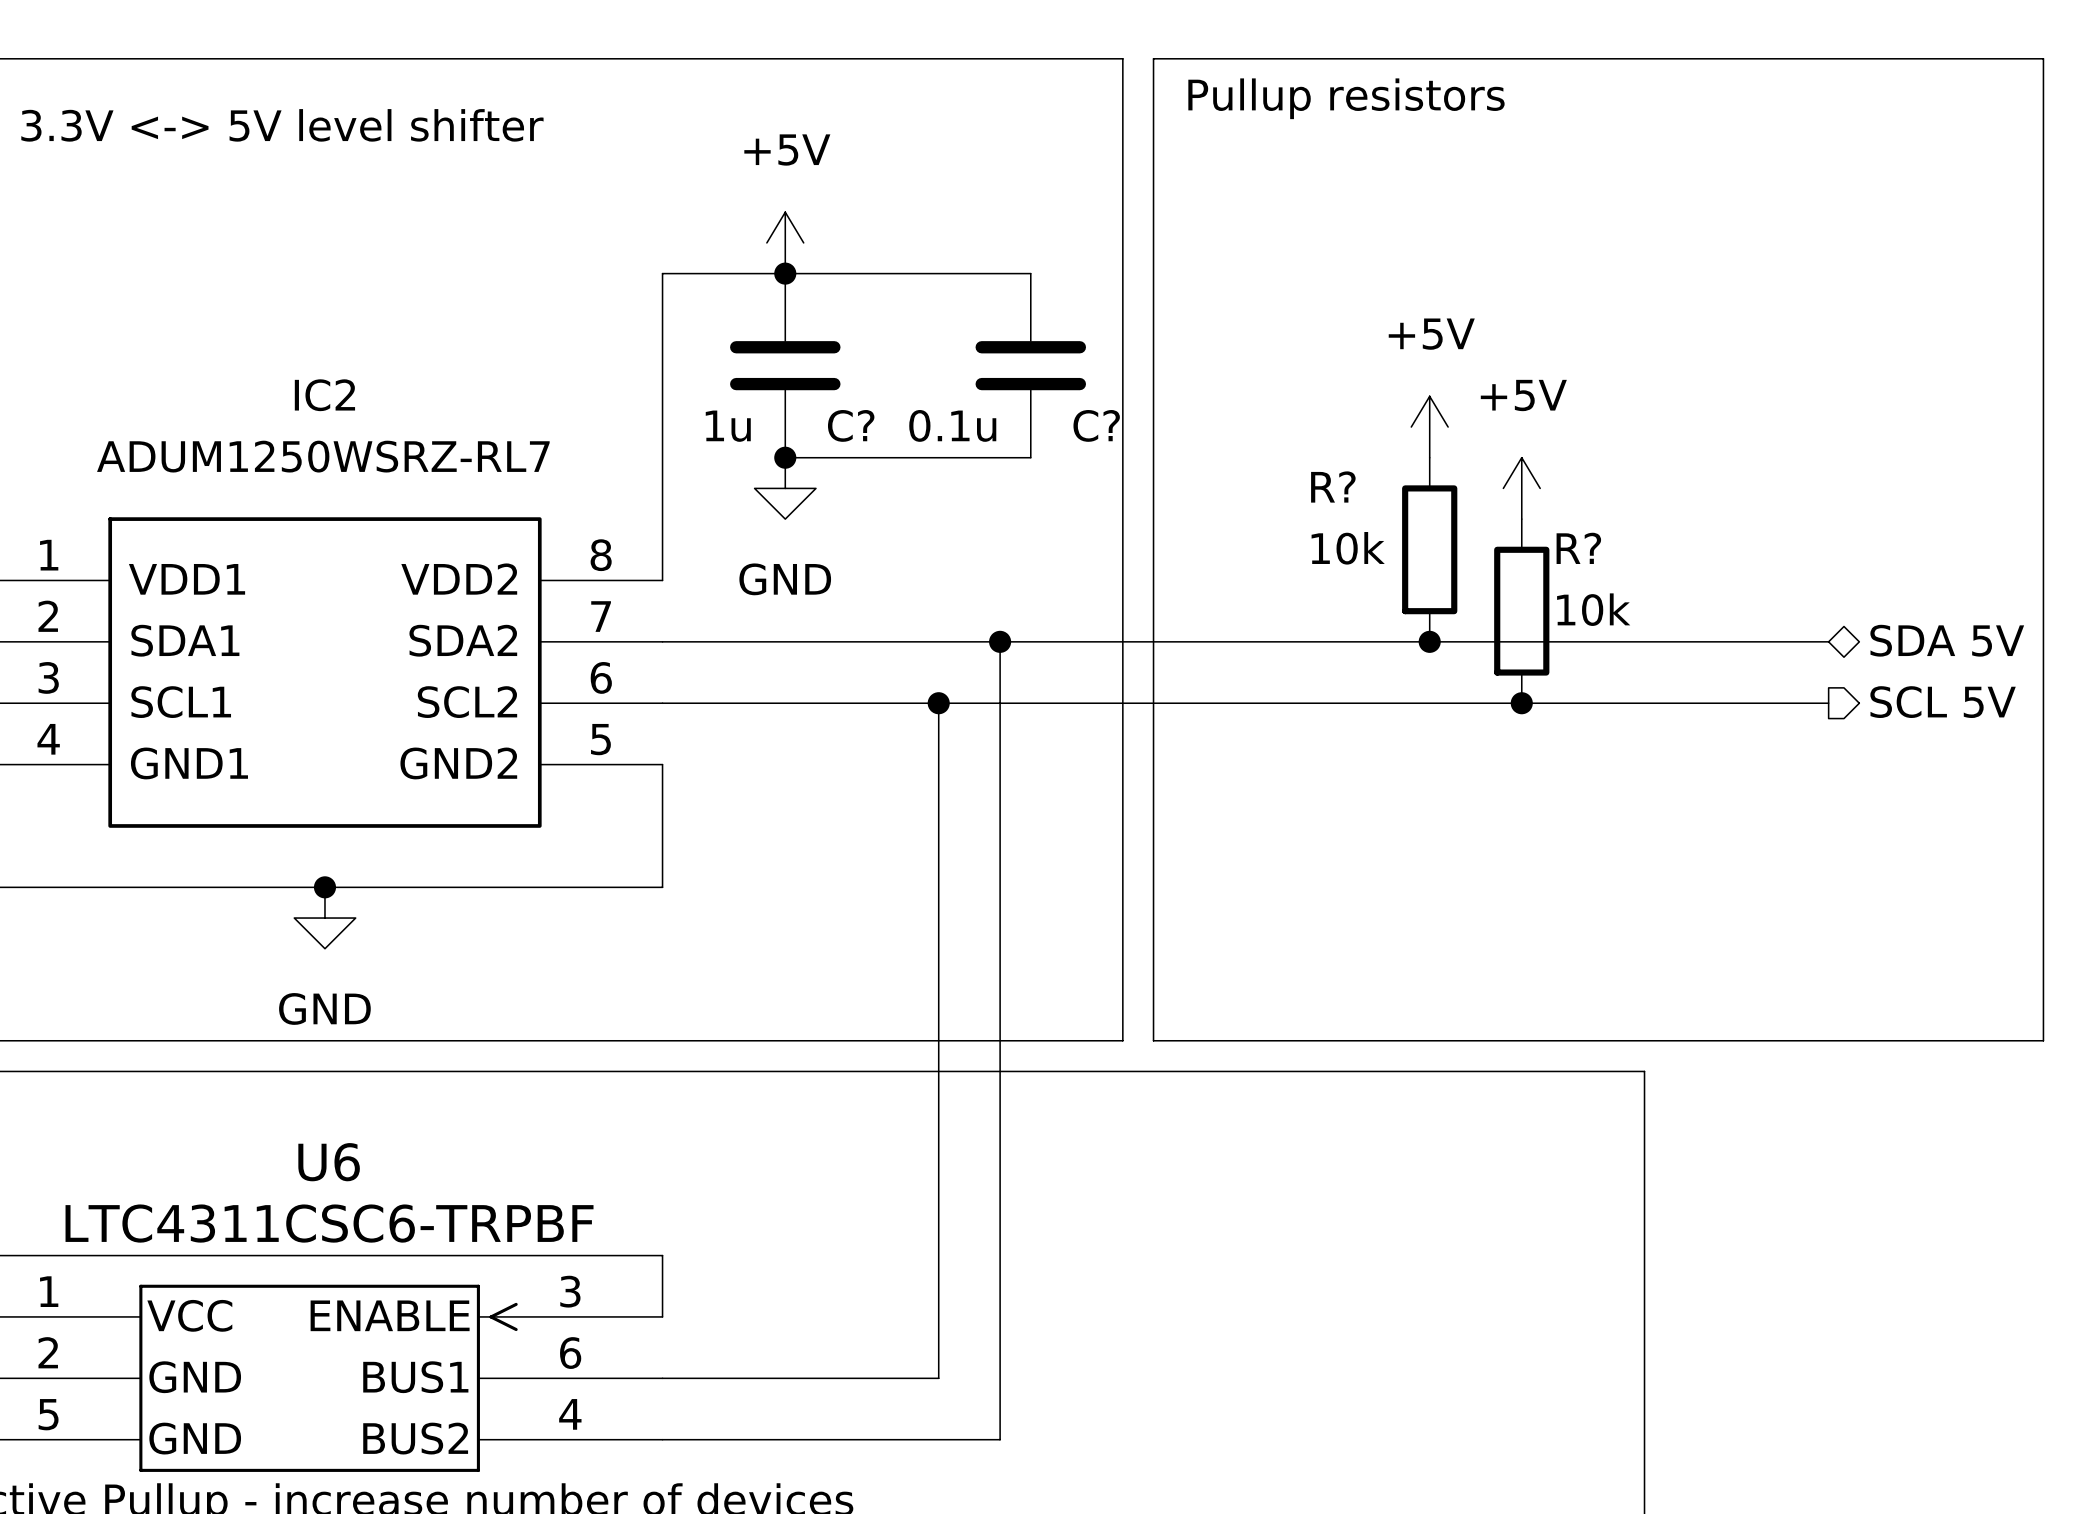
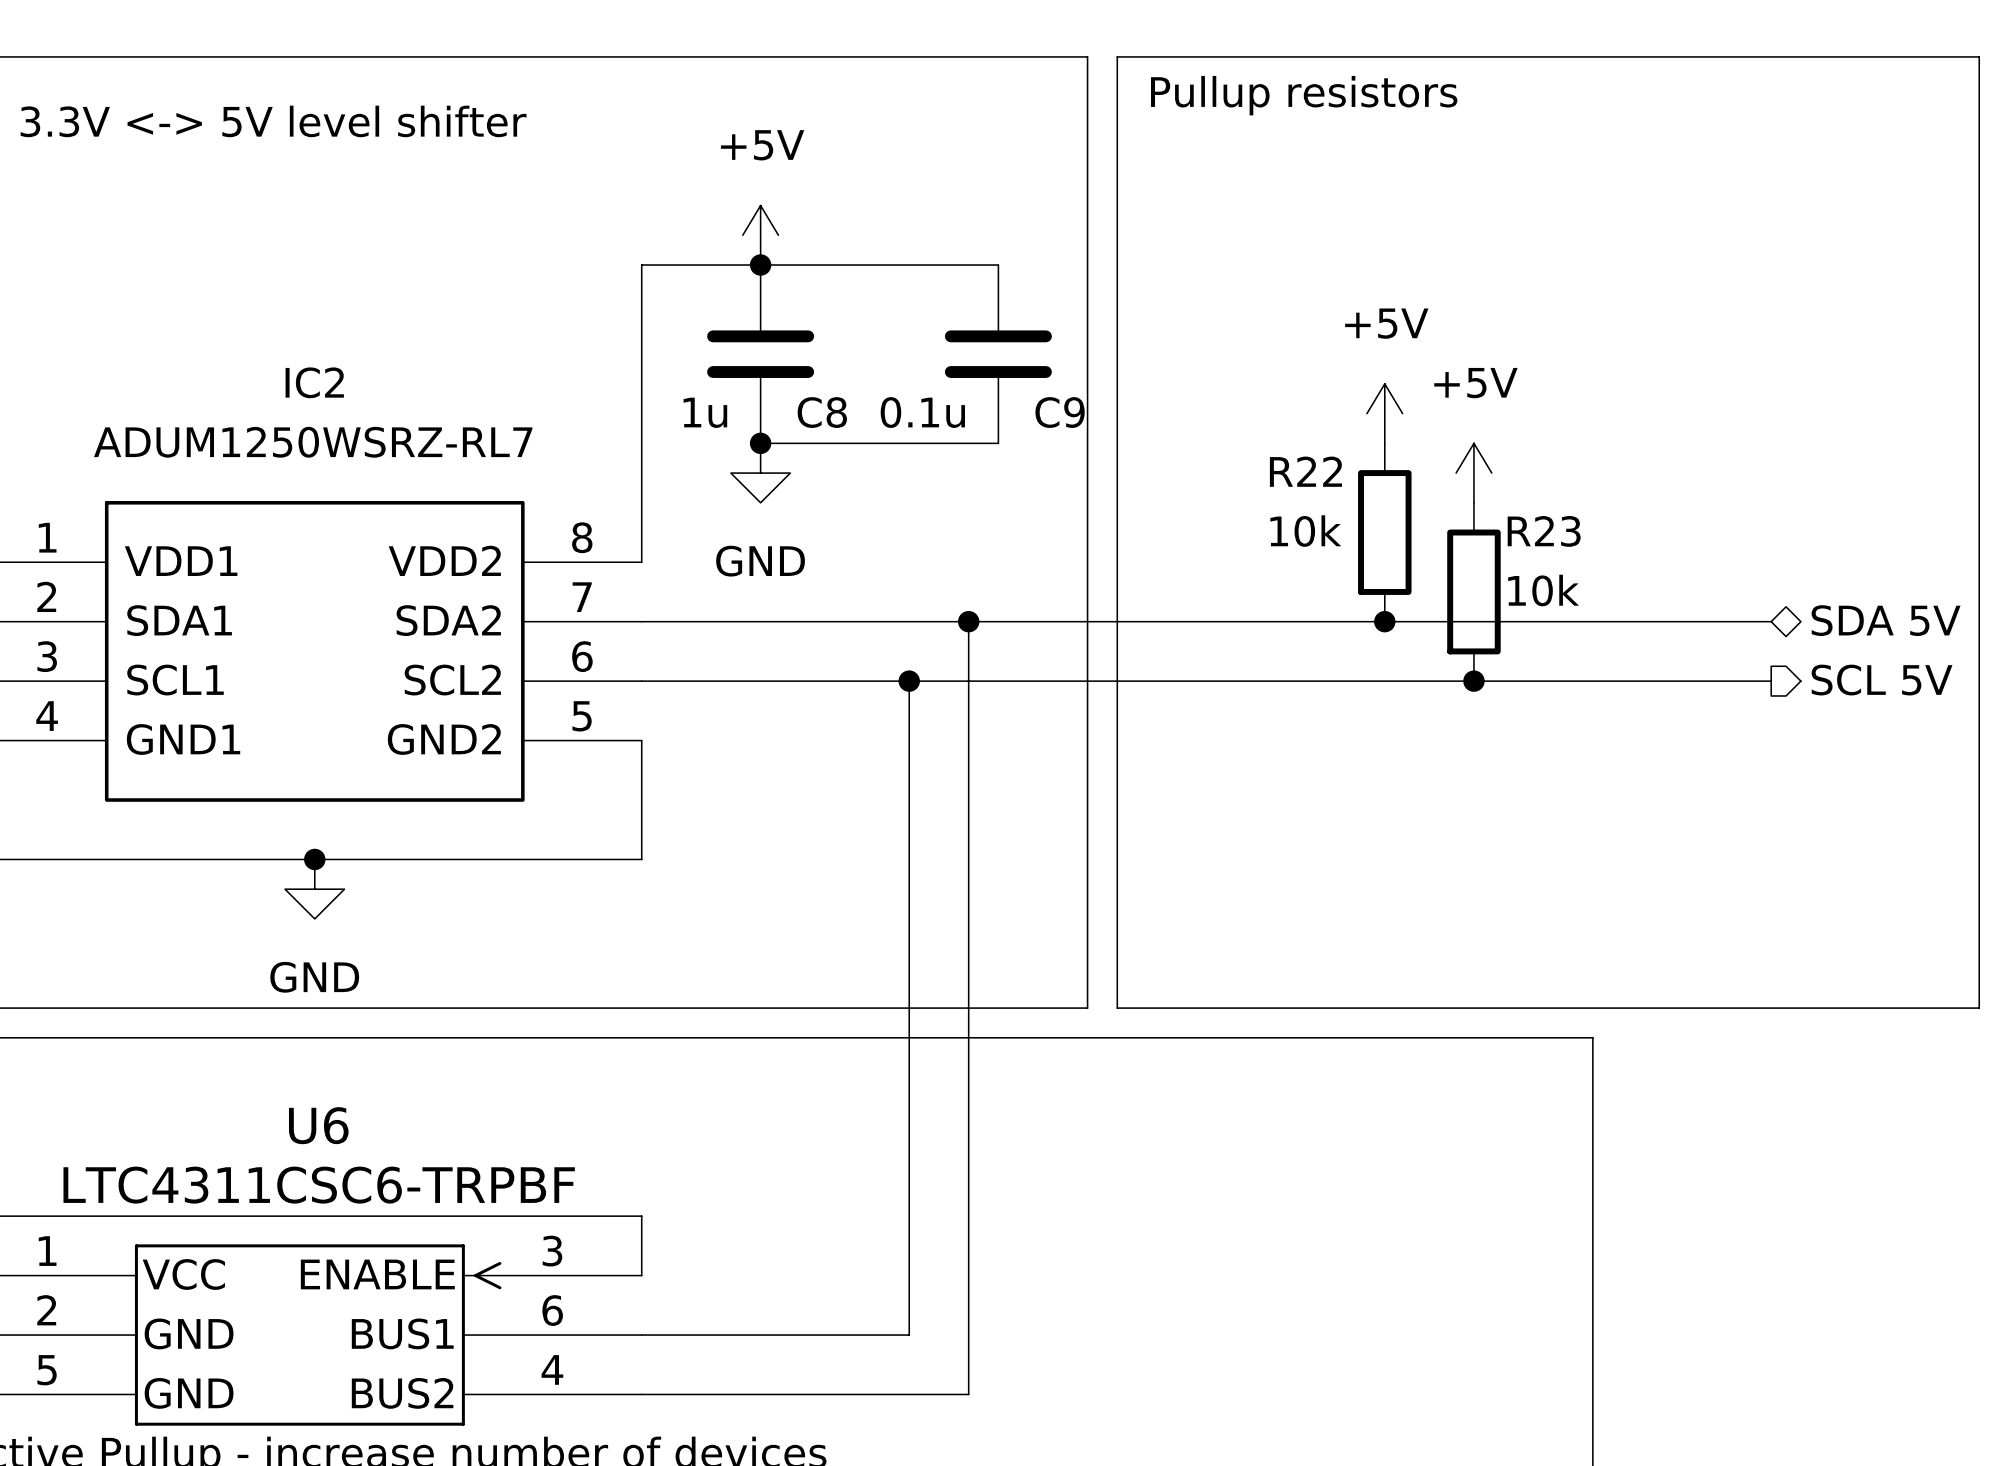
C? name: C? (851, 425) -> C8 (822, 412)
C? name: C? (1096, 425) -> C9 (1060, 412)
R? name: R? (1333, 486) -> R22 (1305, 471)
R? name: R? (1578, 548) -> R23 (1544, 531)

